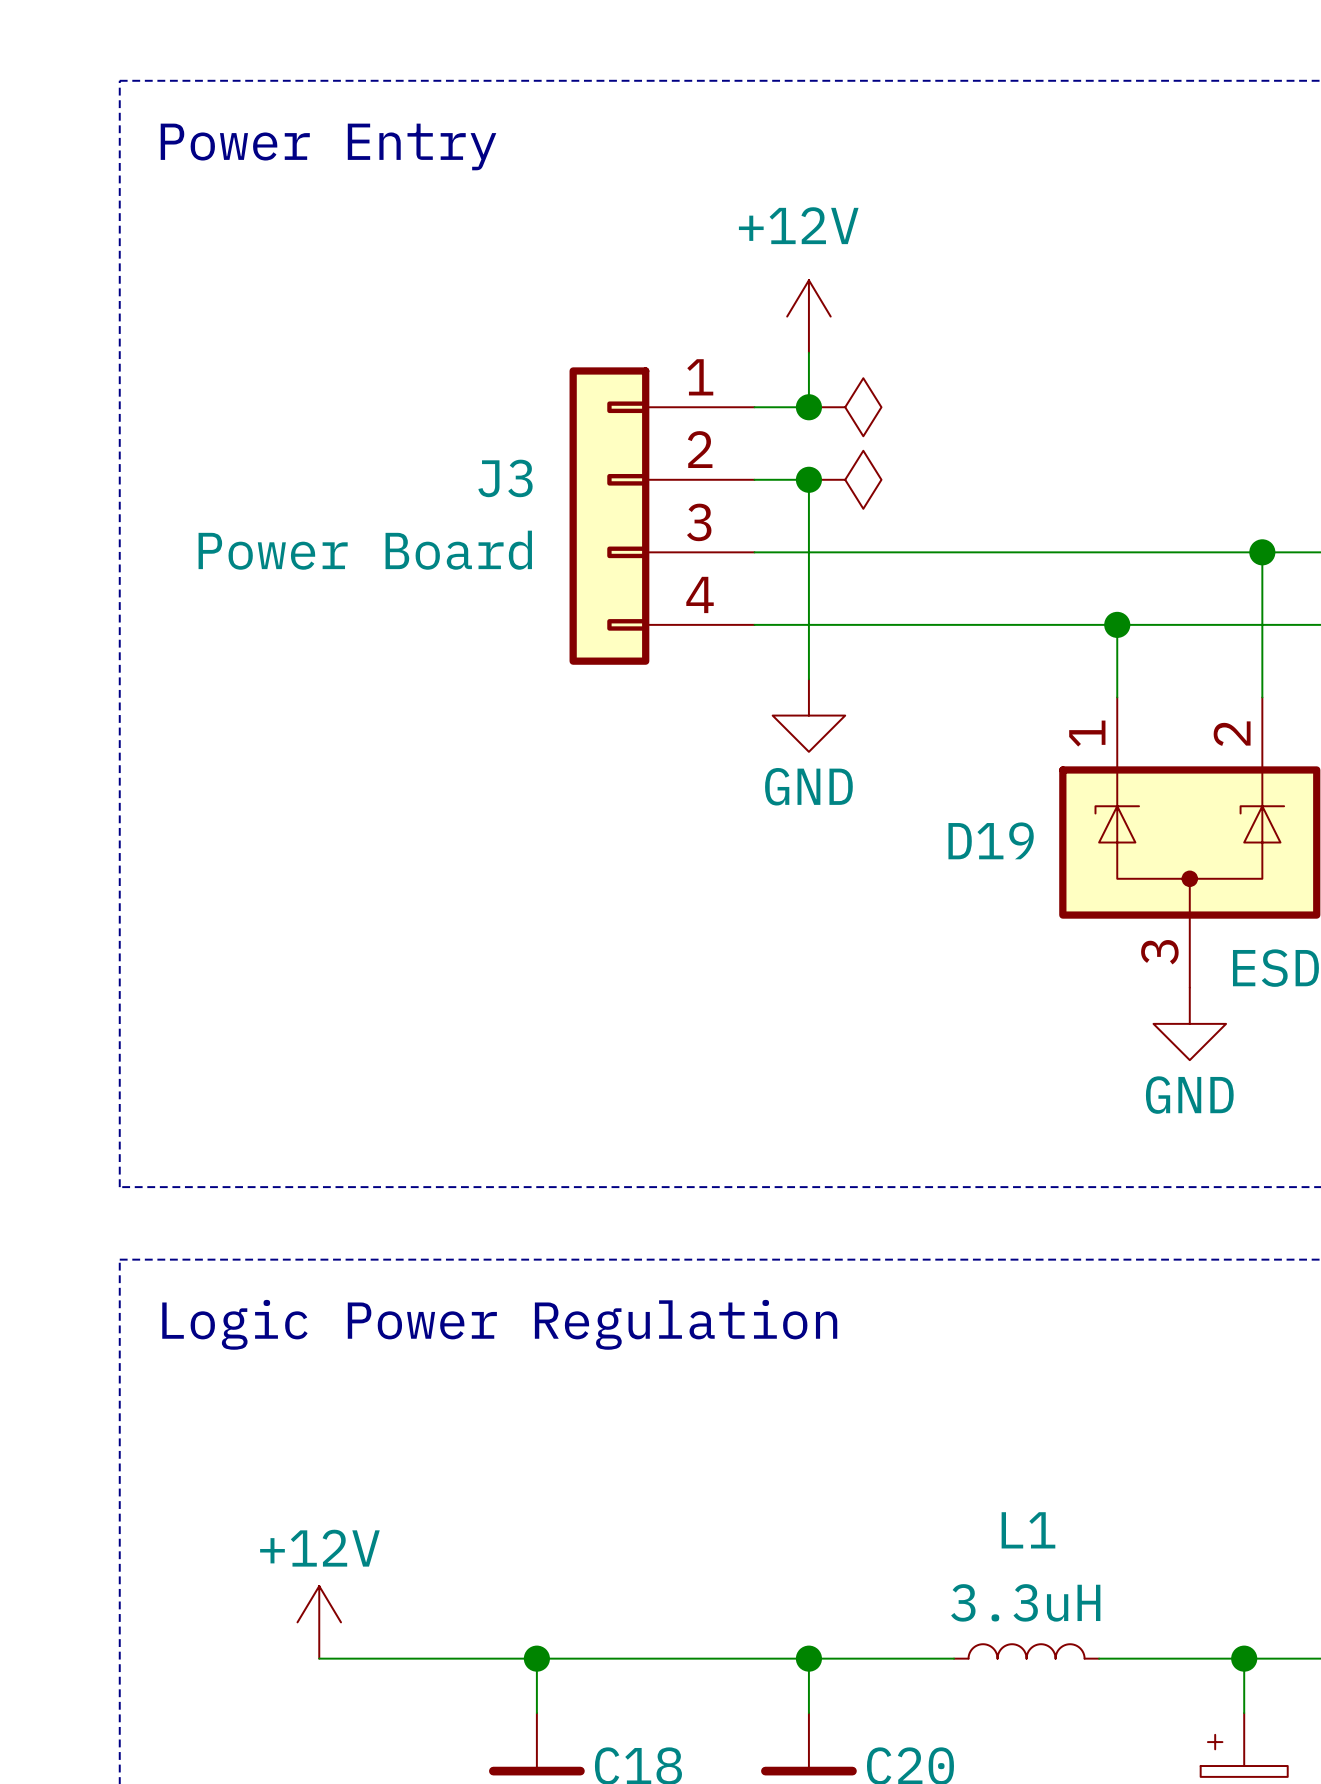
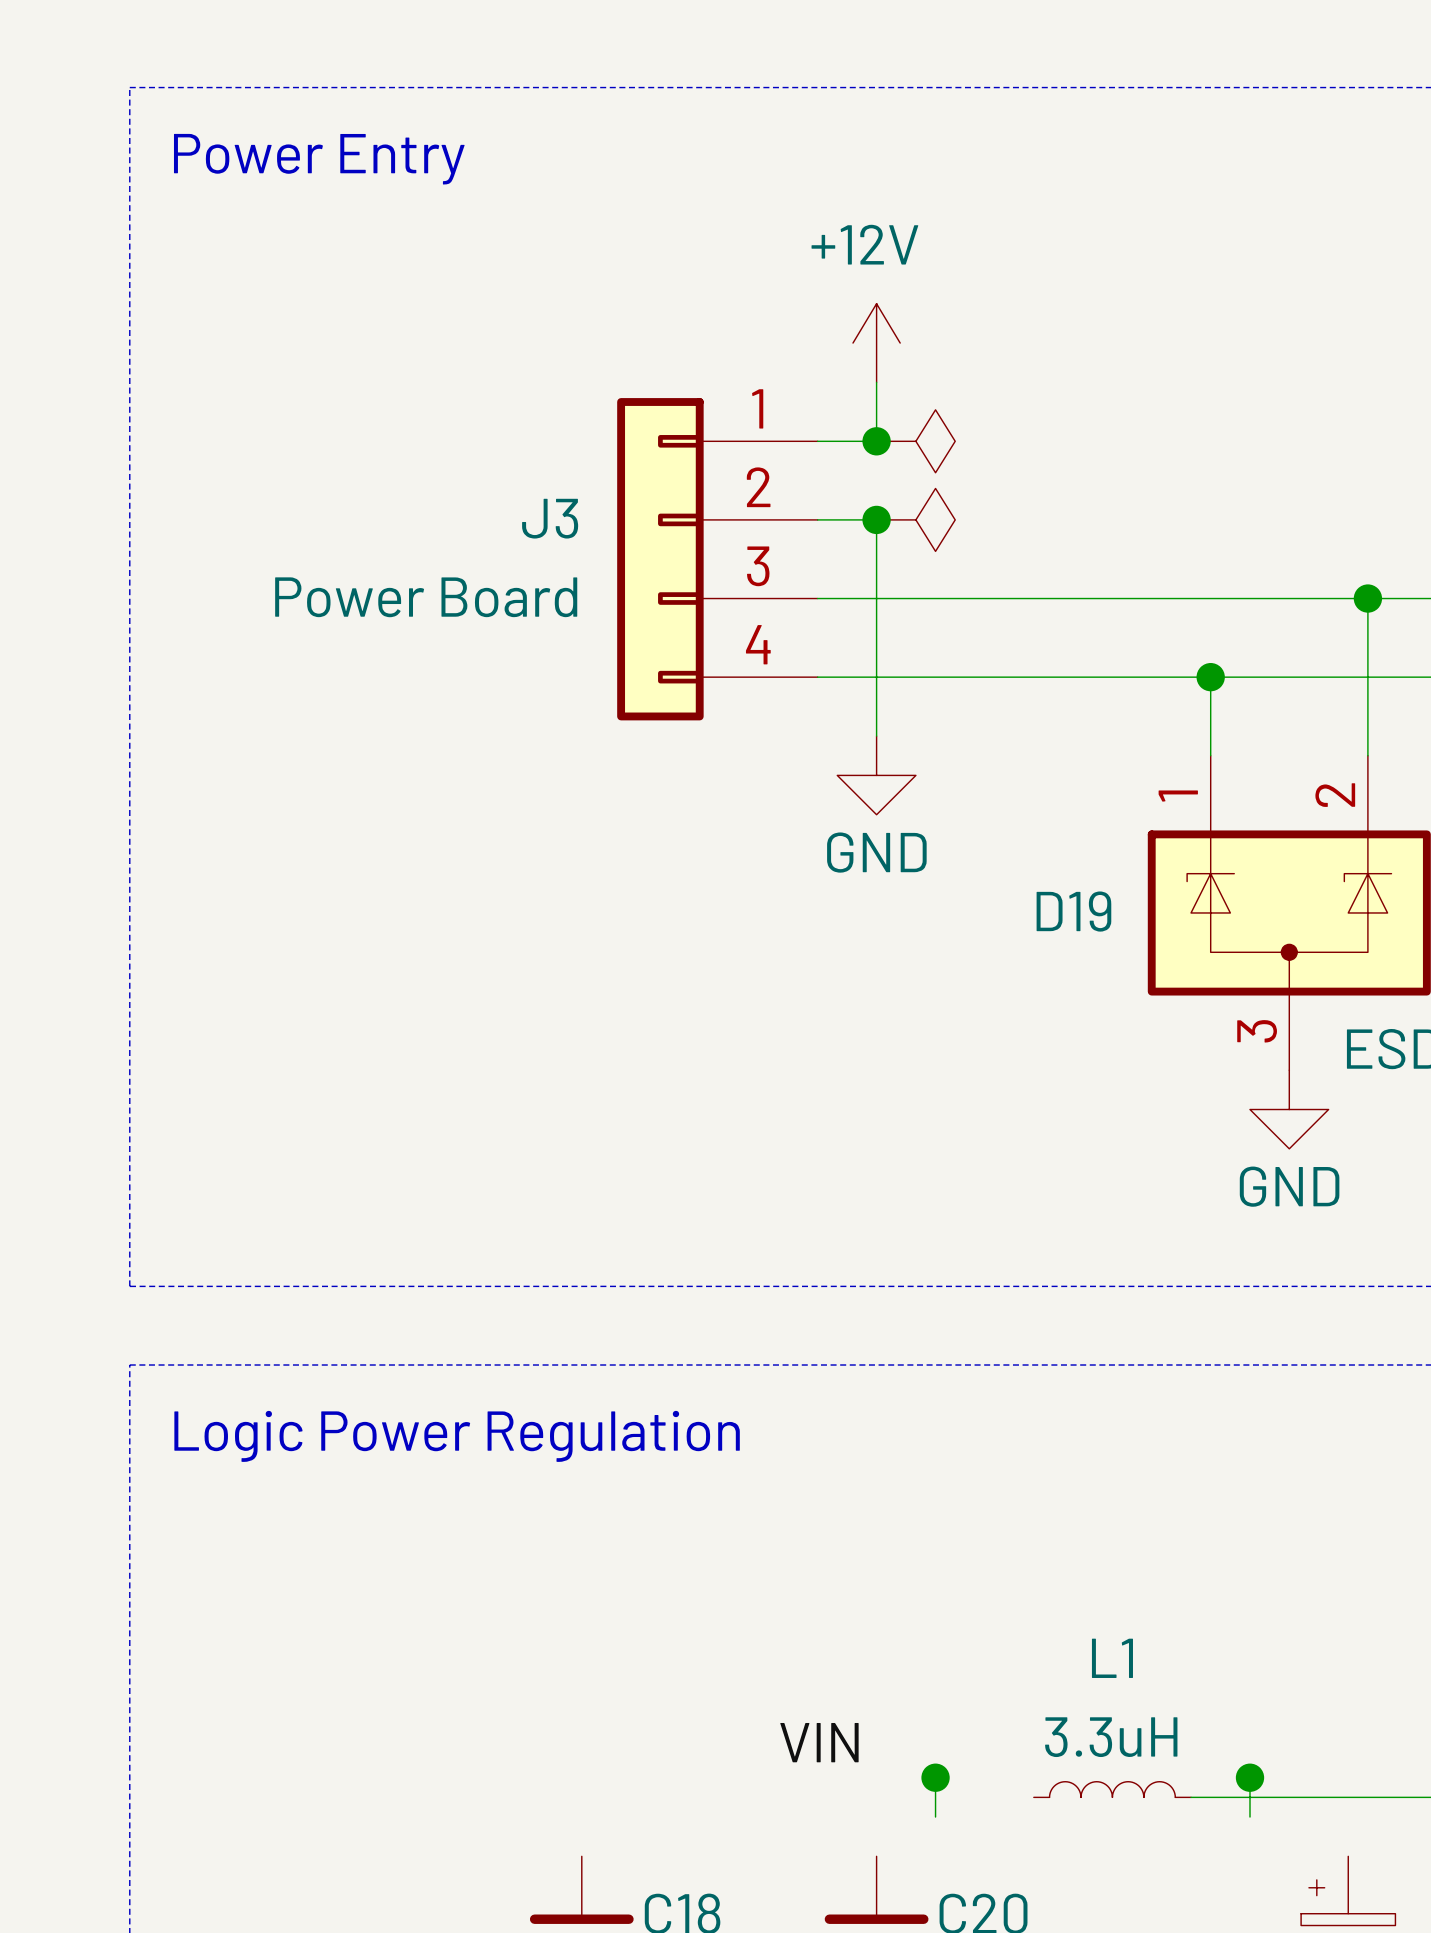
label: none -> VIN (819, 1742)
power symbol: +12V (319, 1622) -> none
wire: none -> (935, 1777) (935, 1817)
wire: none -> (1249, 1777) (1249, 1817)
wire: (319, 1658) (954, 1658) -> none
wire: (536, 1658) (536, 1713) -> none
junction: (536, 1658) -> none
wire: (808, 1658) (808, 1713) -> none
junction position: (808, 1658) -> (935, 1777)
wire: (1244, 1658) (1244, 1713) -> none
junction position: (1244, 1658) -> (1249, 1777)

